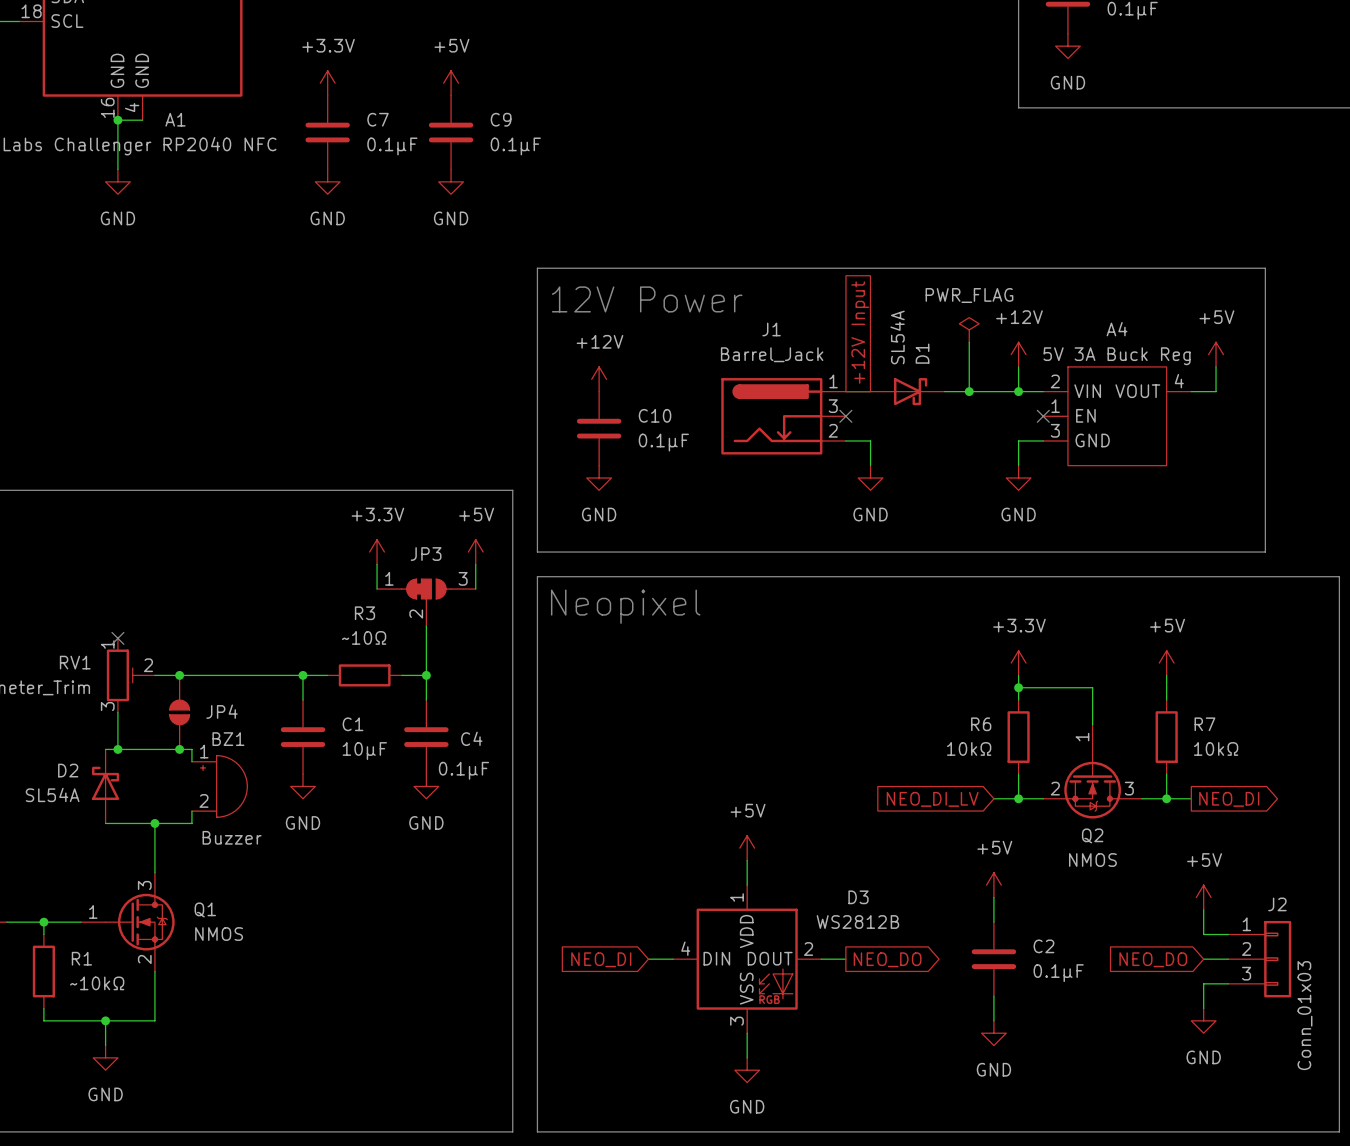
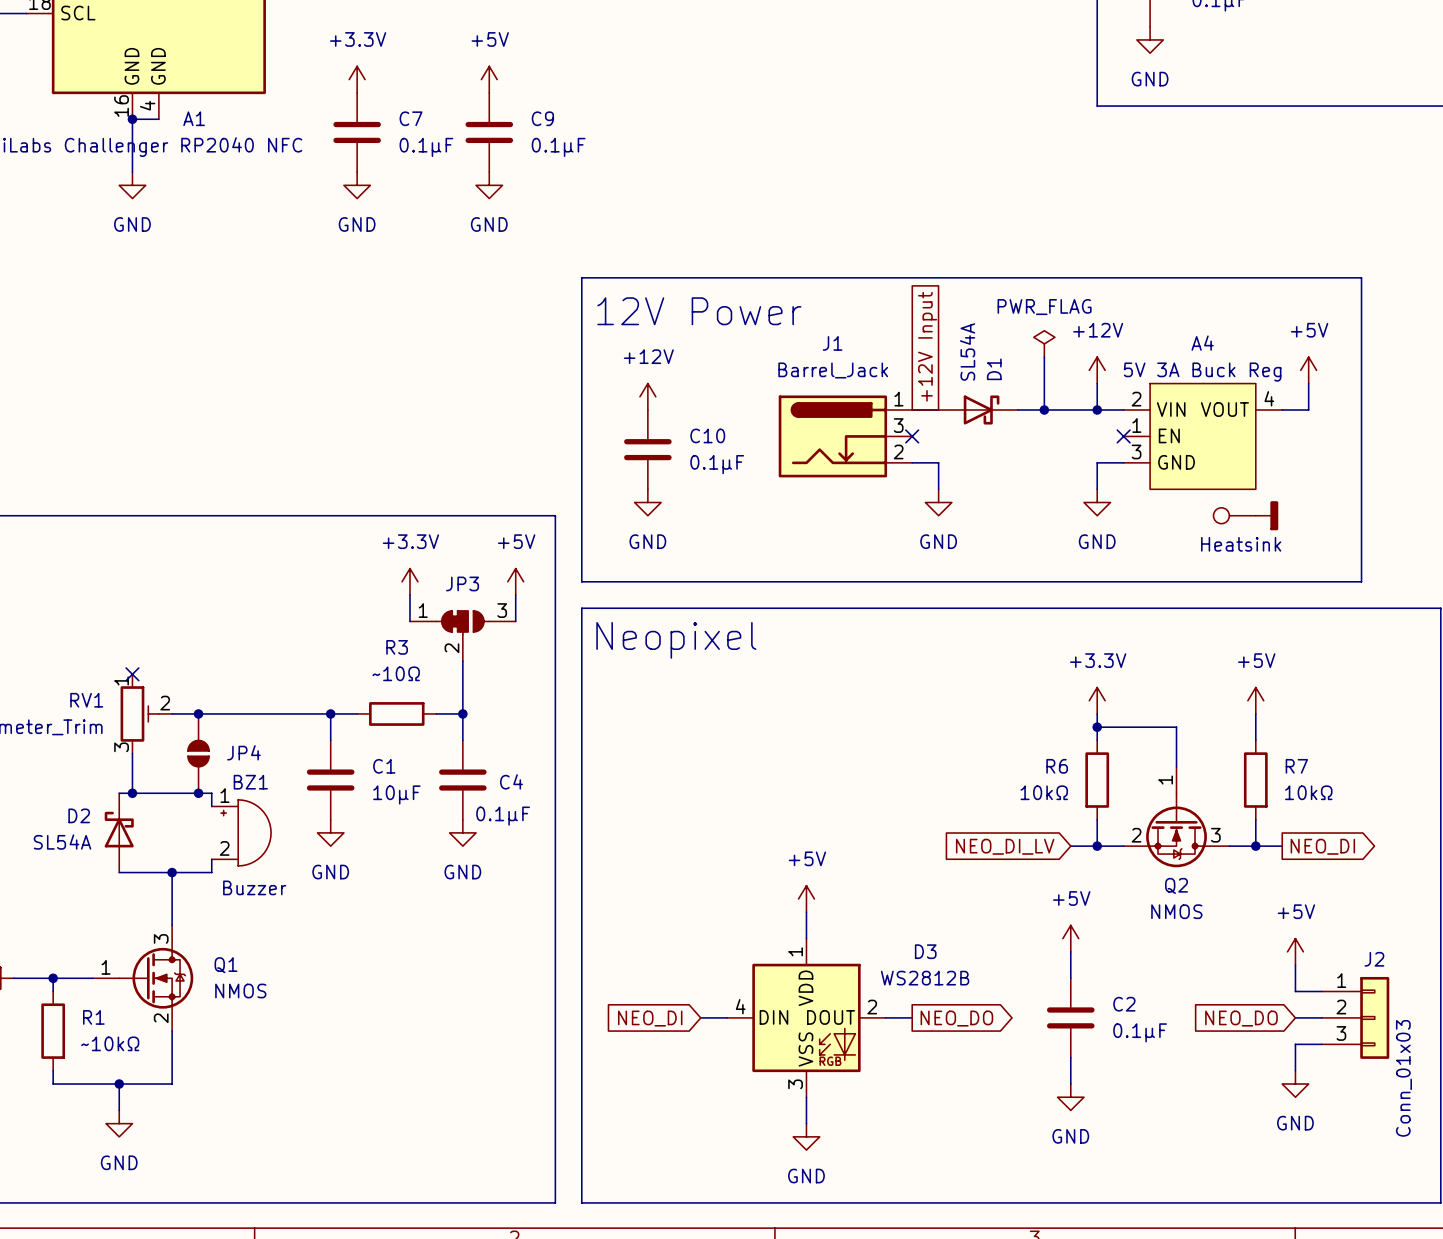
part: none -> (1234, 515)
power symbol: none -> Heatsink (1267, 515)

